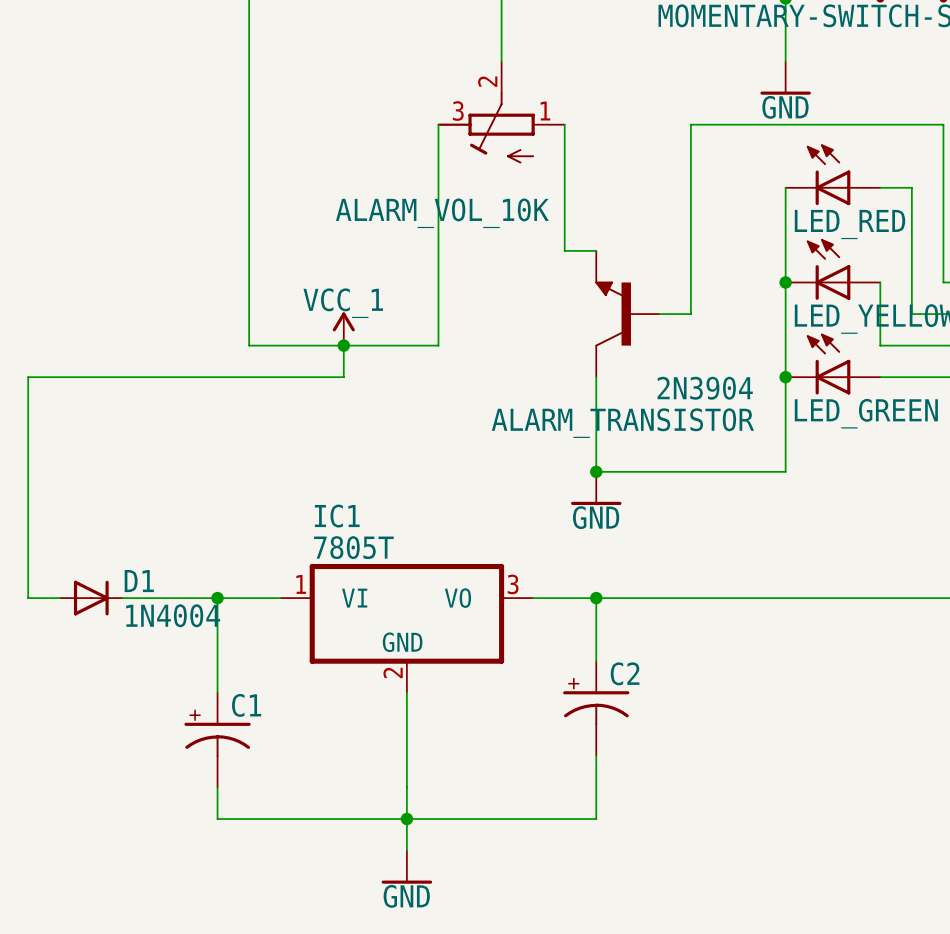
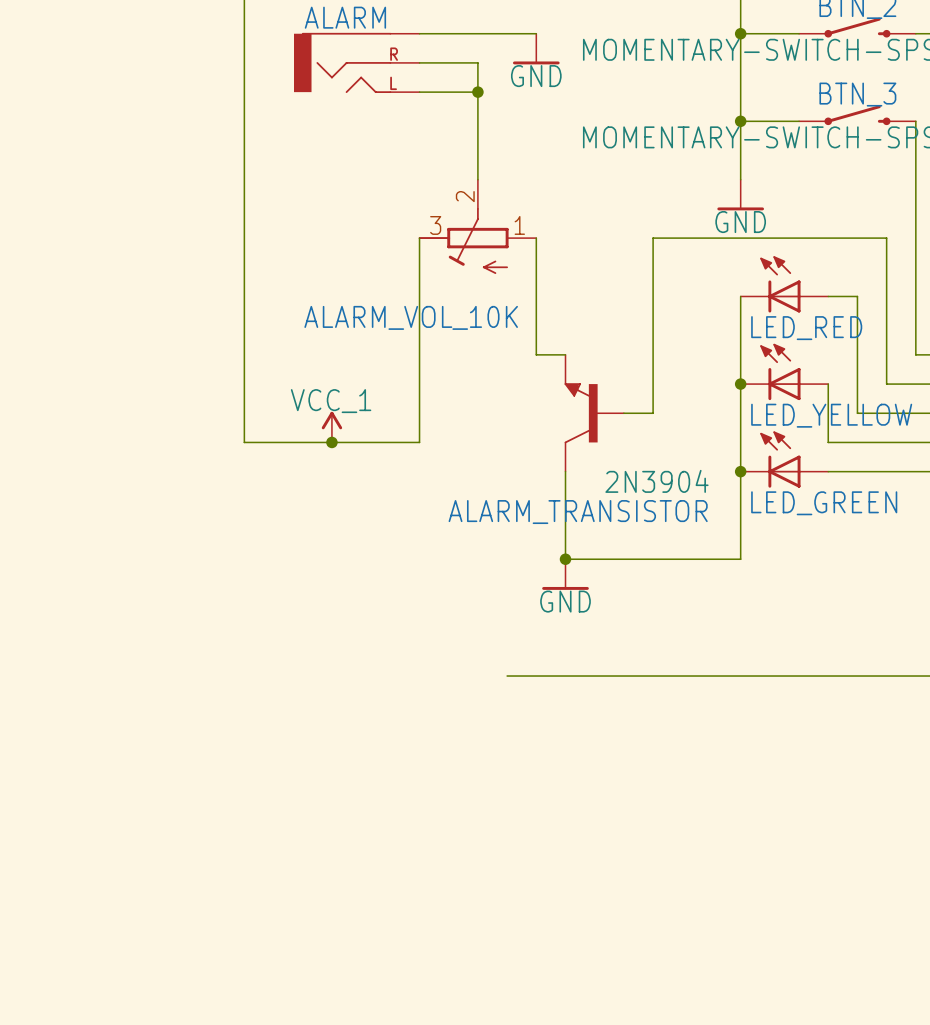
wire: (343, 345) (343, 377) (28, 377) (28, 598) (59, 598) -> none
D1: 1N4004 (91, 598) -> none
wire: (122, 598) (280, 598) -> none
wire: (217, 598) (217, 692) -> none
junction: (217, 598) -> none
wire: (596, 598) (596, 661) -> none
junction: (596, 598) -> none
IC1: 7805T (406, 628) -> none
wire: (406, 692) (406, 850) -> none
C2: (596, 708) -> none
C1: (217, 740) -> none
wire: (596, 755) (596, 819) (217, 819) (217, 787) -> none
junction: (406, 819) -> none
power symbol: GND (406, 867) -> none

